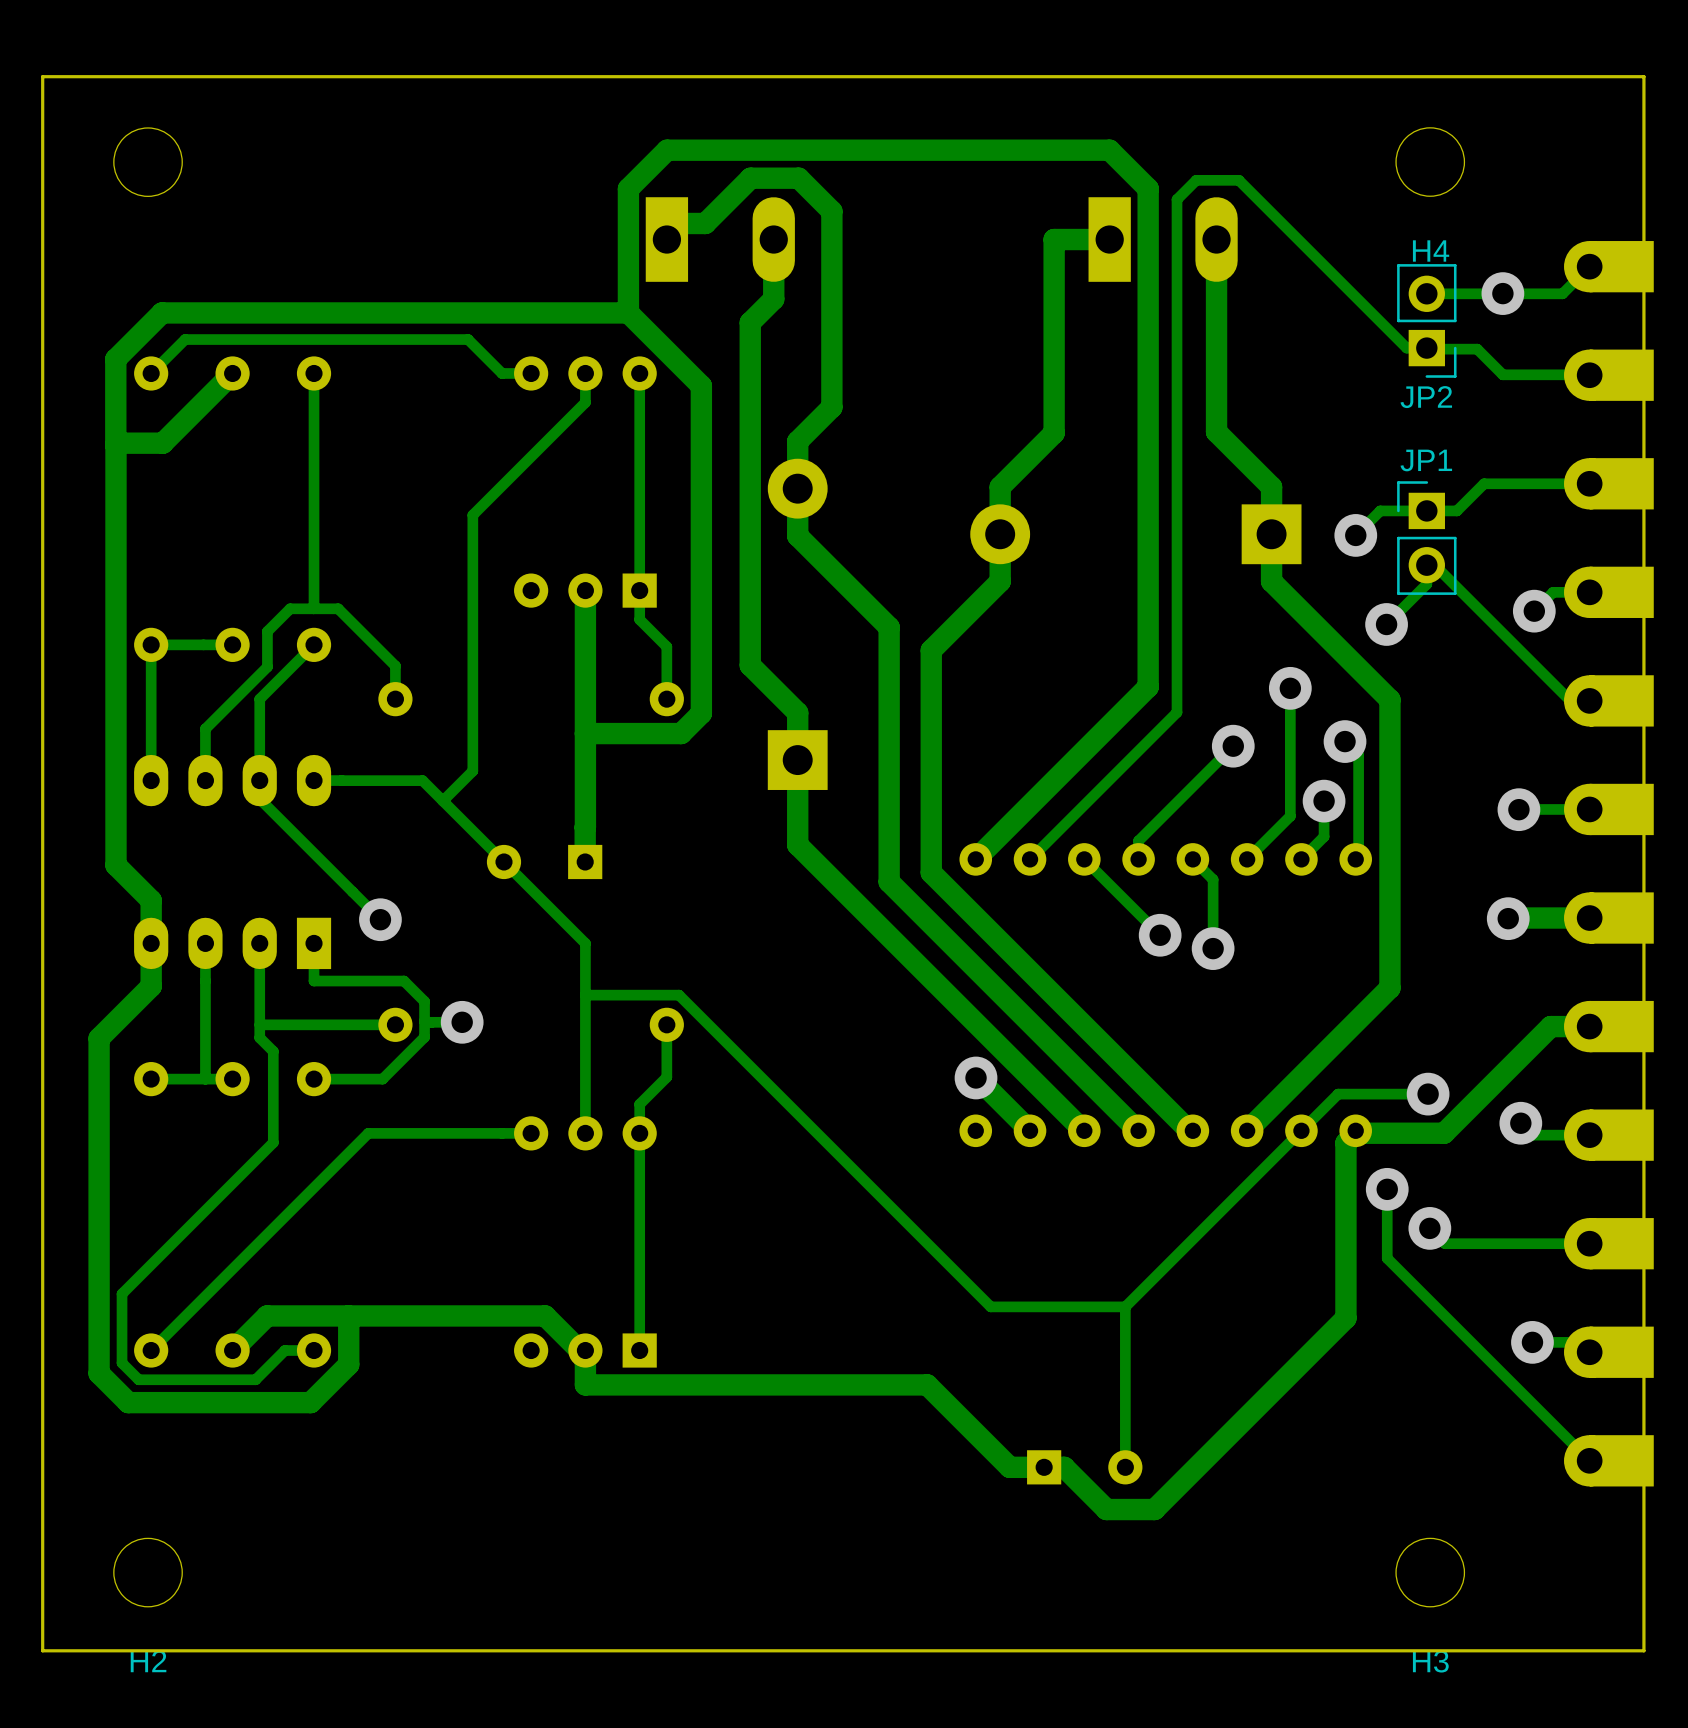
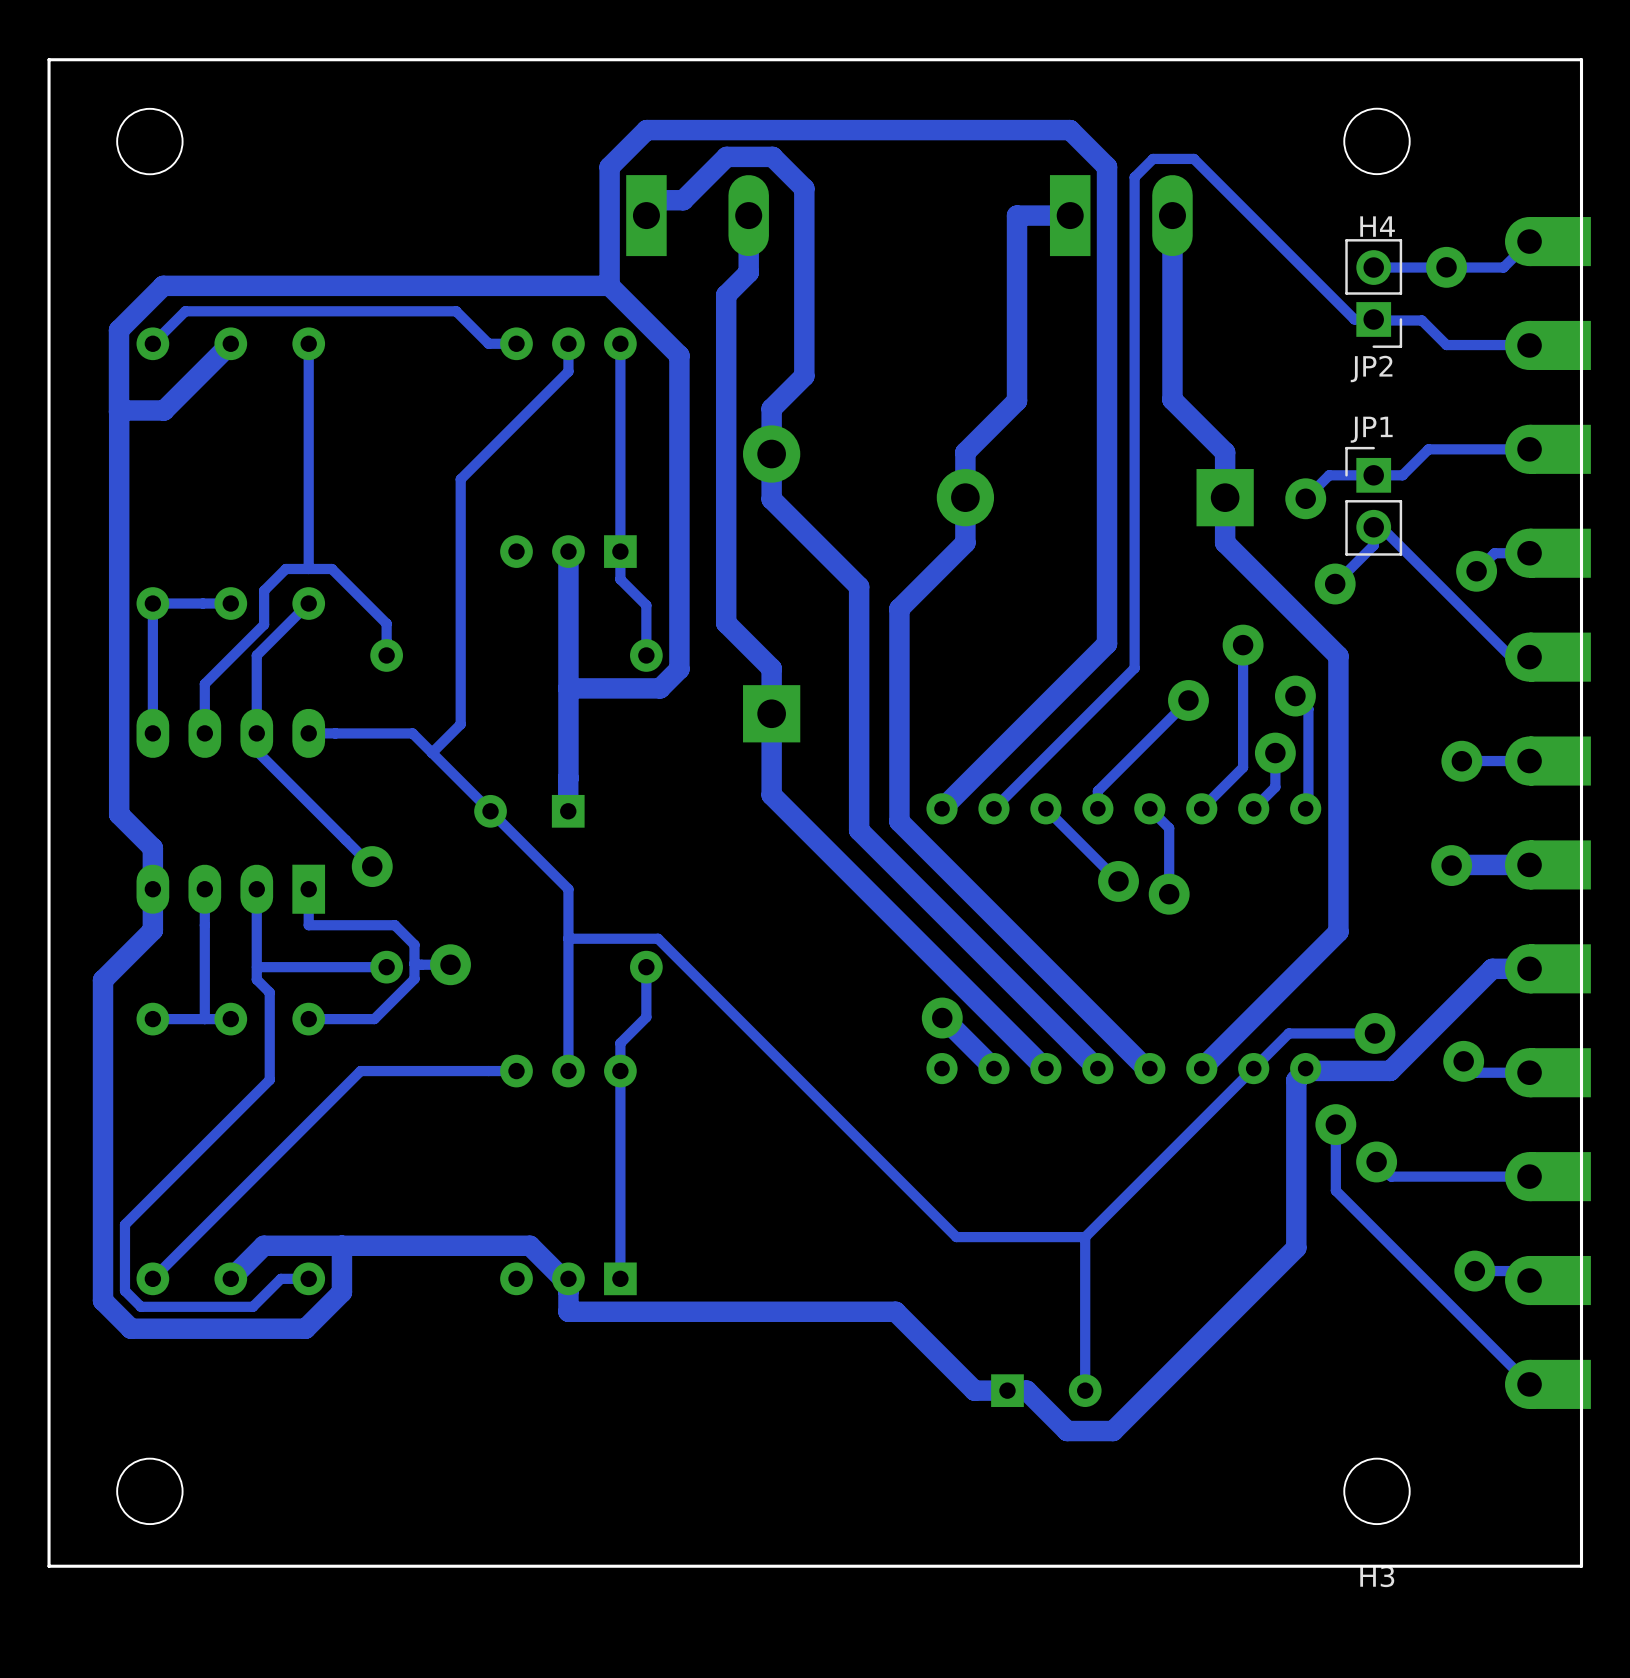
H2 name: H2 (148, 1661) -> none

